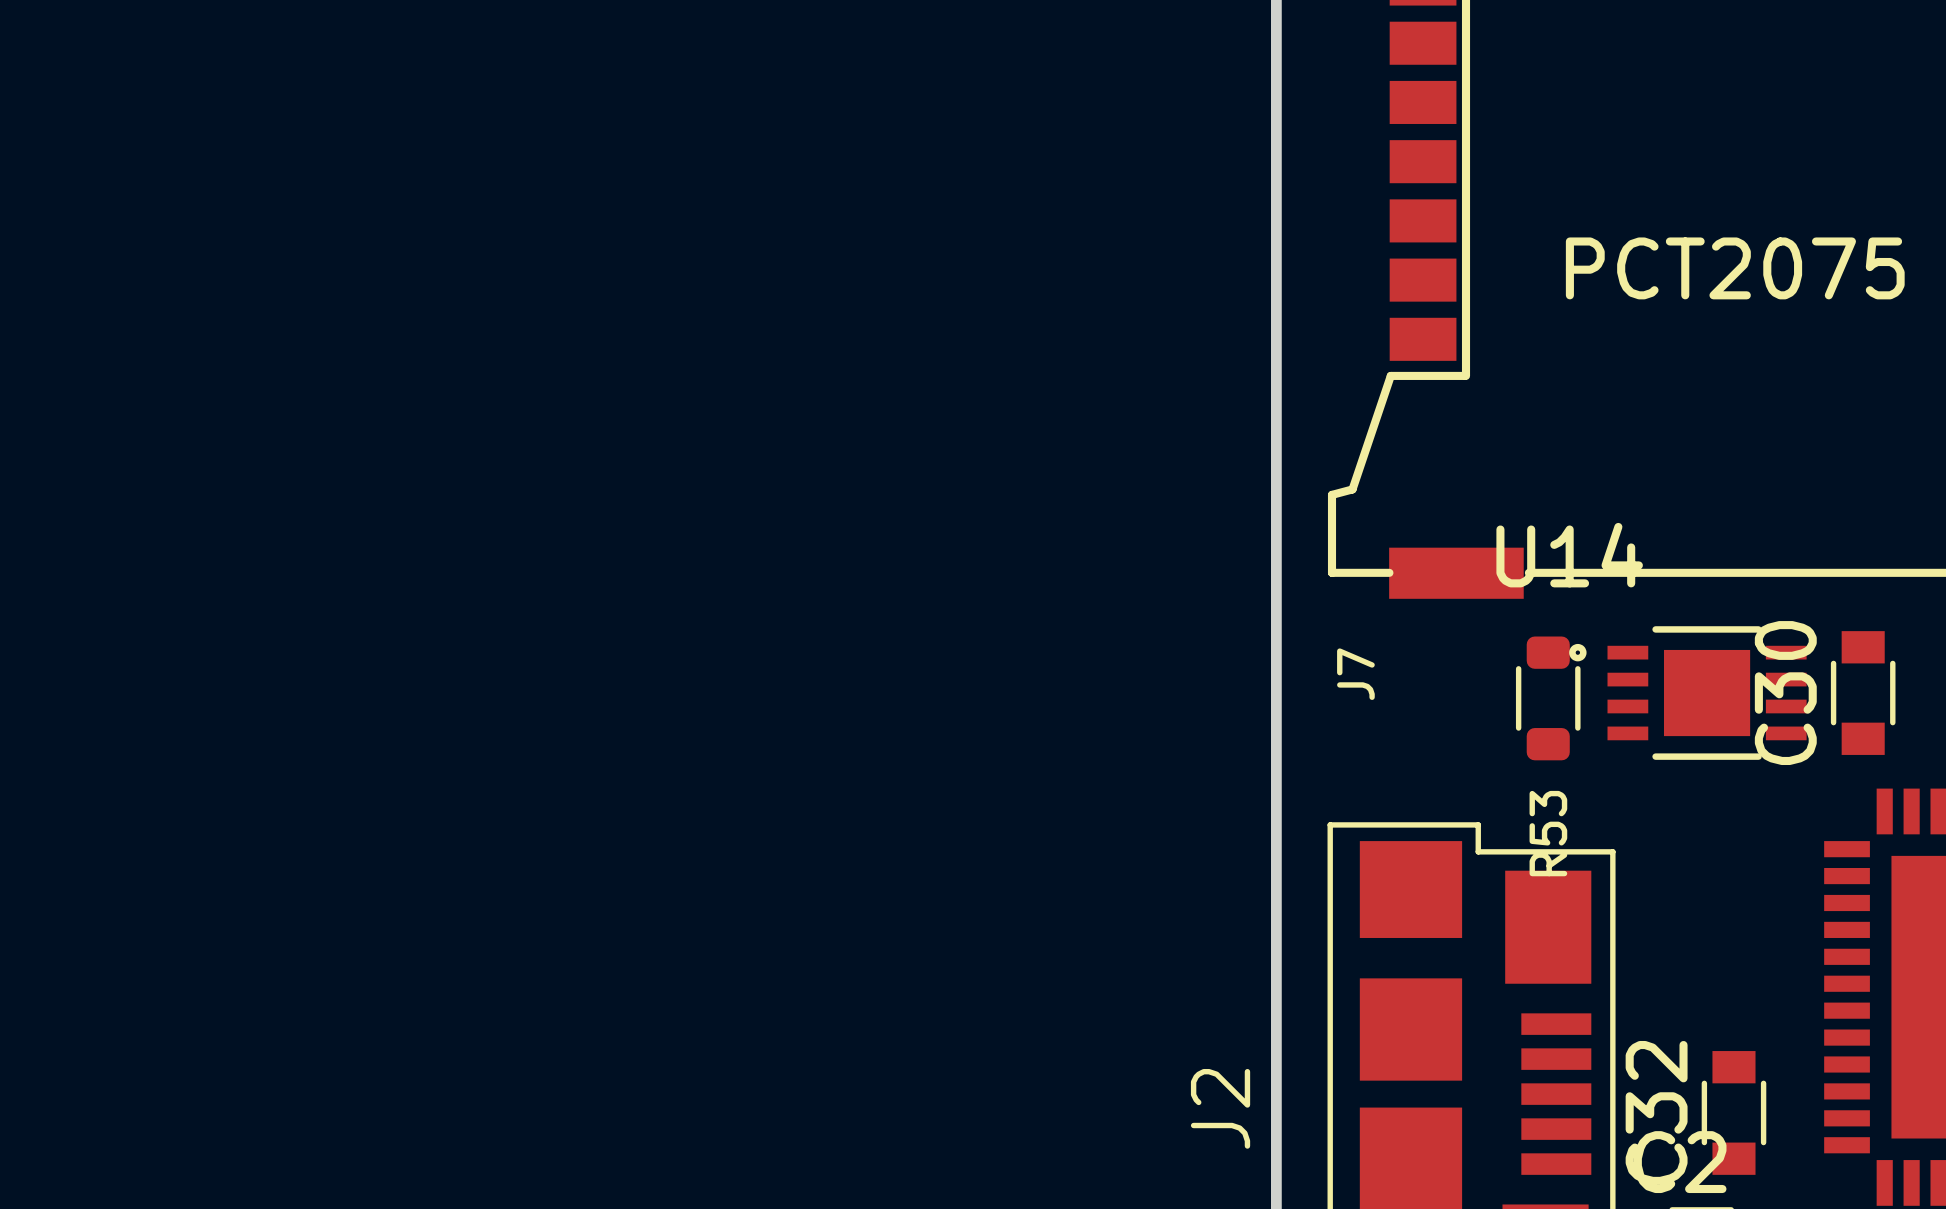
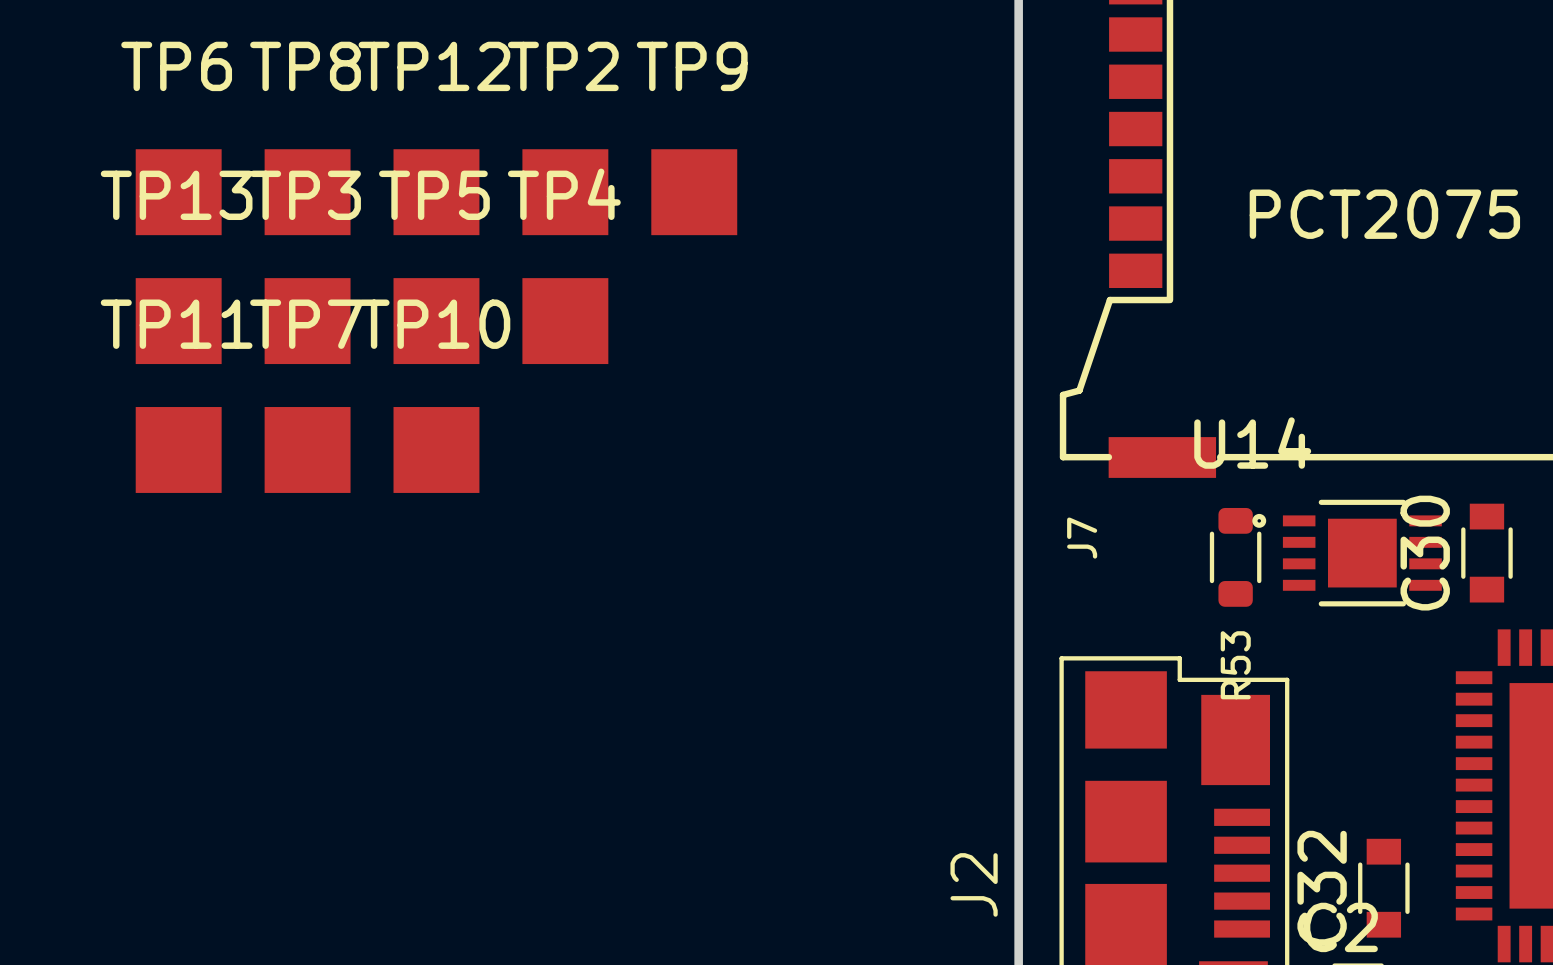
TP6: none -> (178, 192)
TP8: none -> (307, 192)
TP12: none -> (436, 192)
TP2: none -> (565, 192)
TP9: none -> (694, 192)
TP13: none -> (178, 321)
TP3: none -> (307, 321)
TP5: none -> (436, 321)
TP4: none -> (565, 321)
TP11: none -> (178, 449)
TP7: none -> (307, 449)
TP10: none -> (436, 449)

